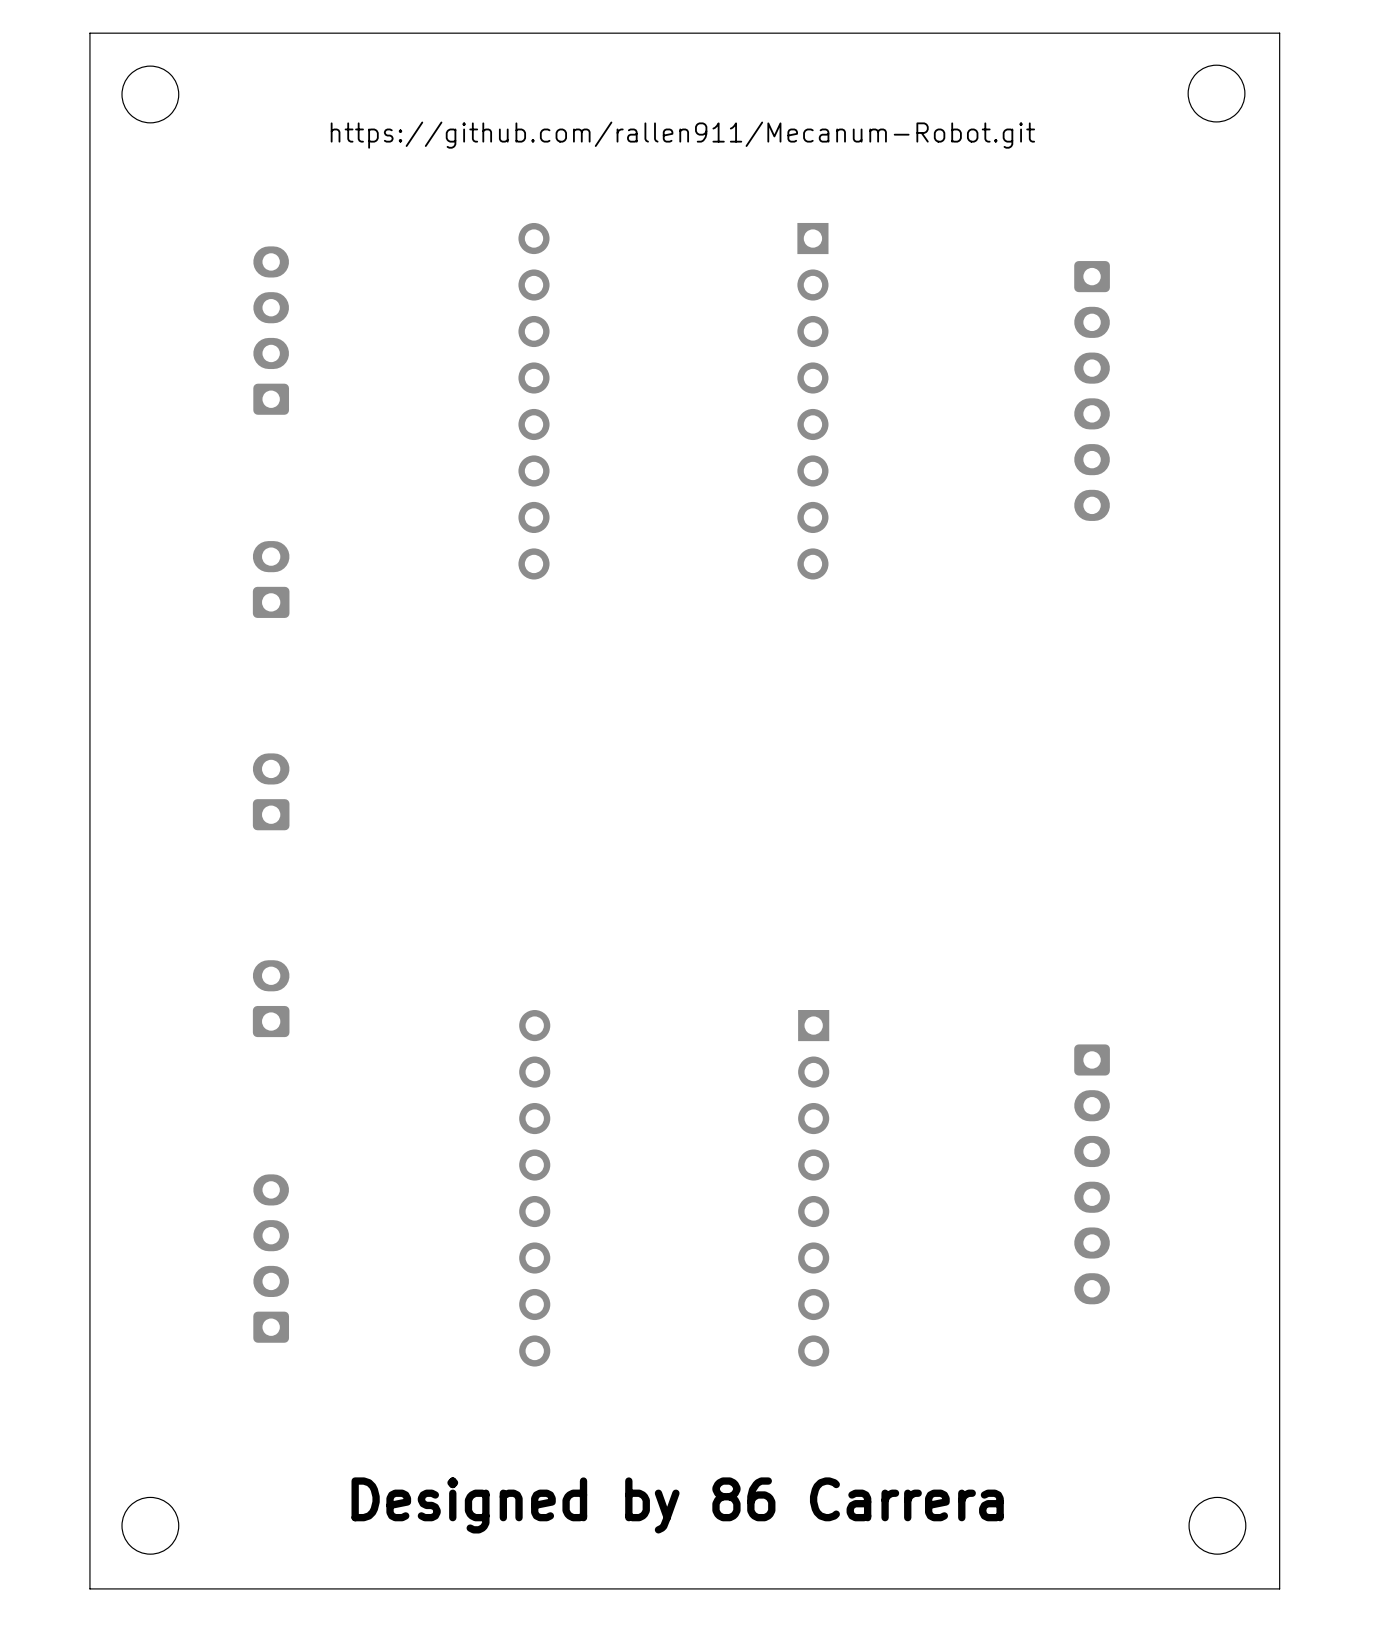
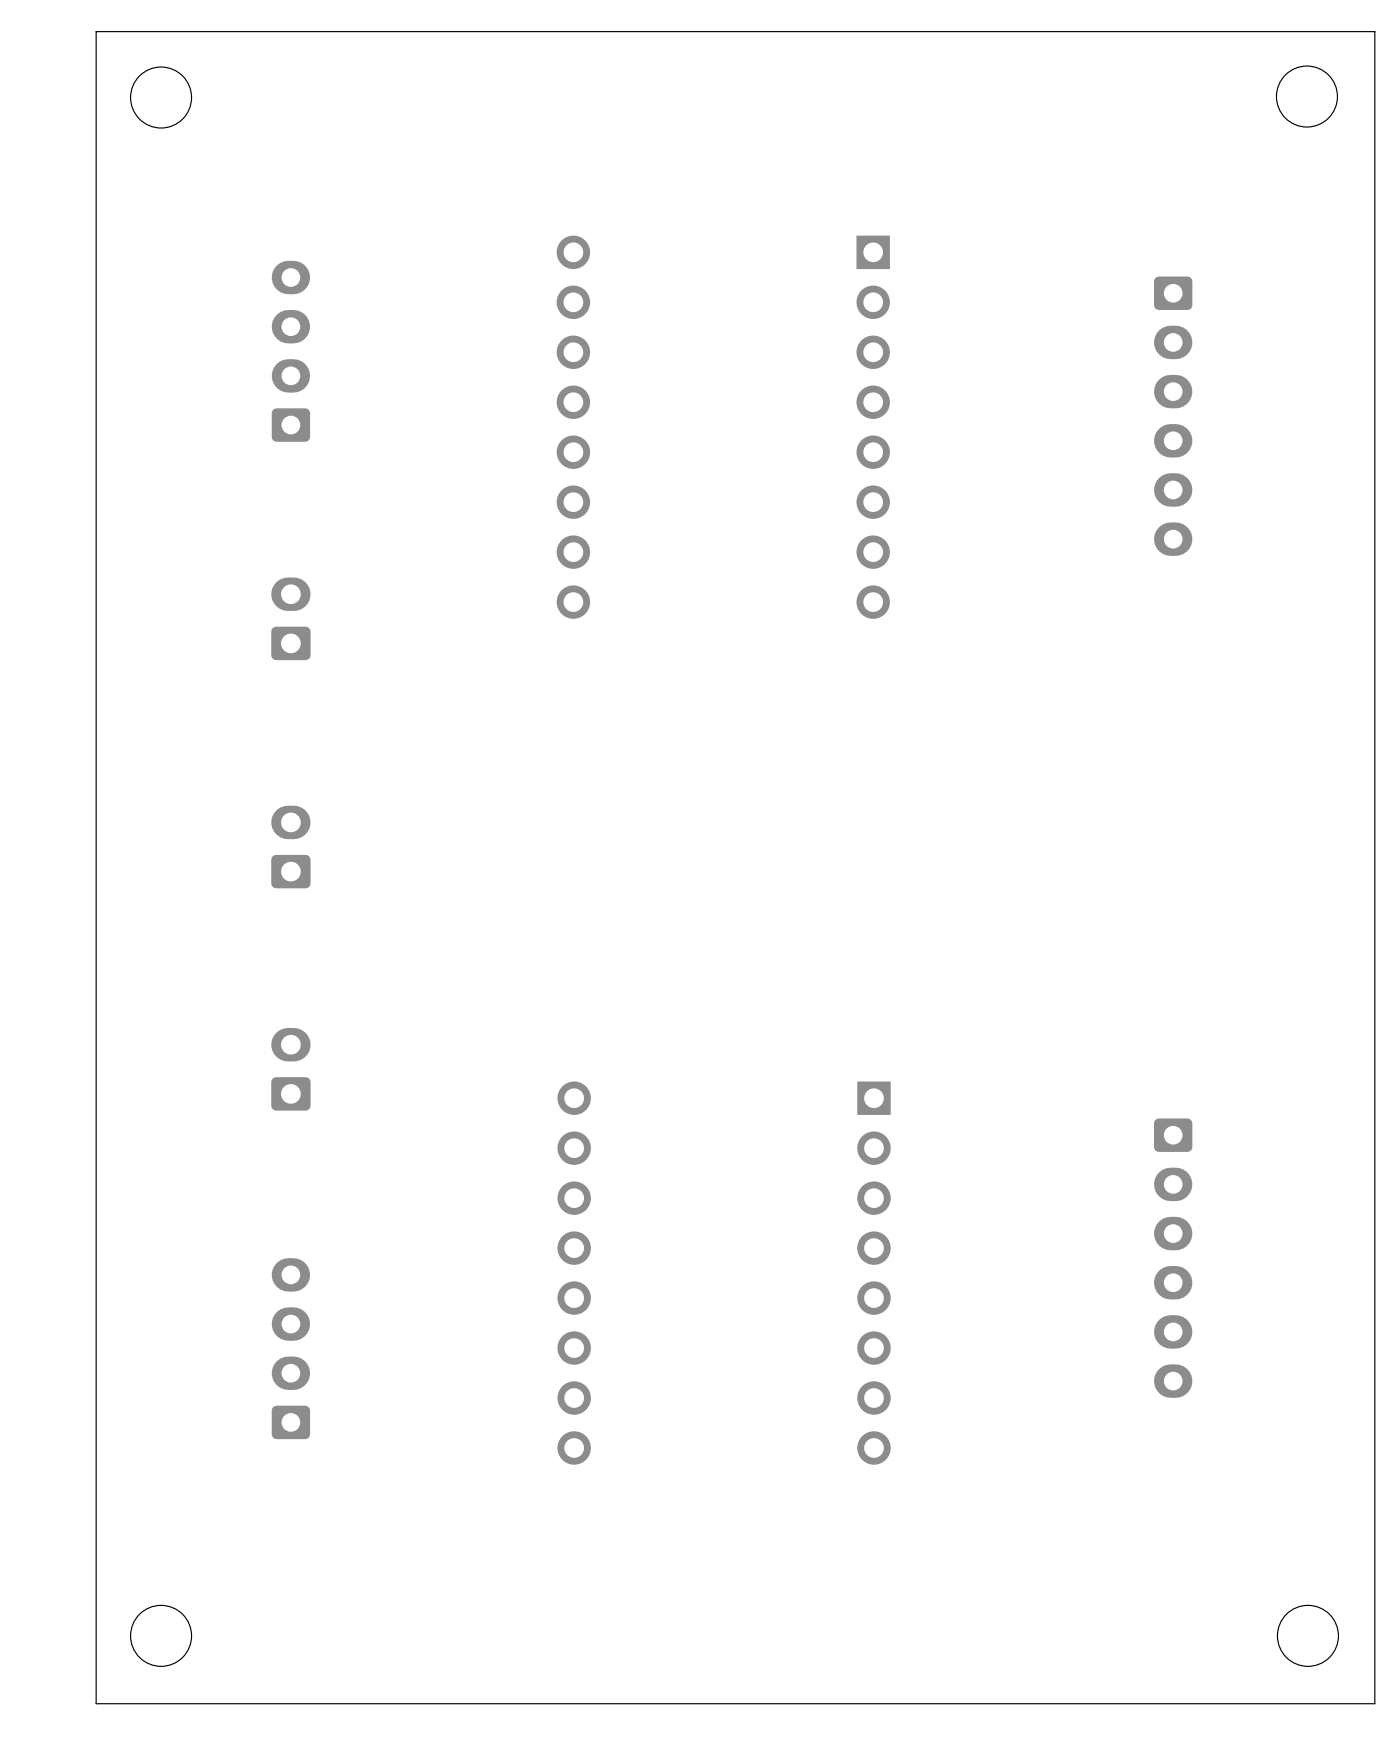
text: https://github.com/rallen911/Mecanum-Robot.git (682, 135) -> none
text: Designed by 86 Carrera (677, 1505) -> none

